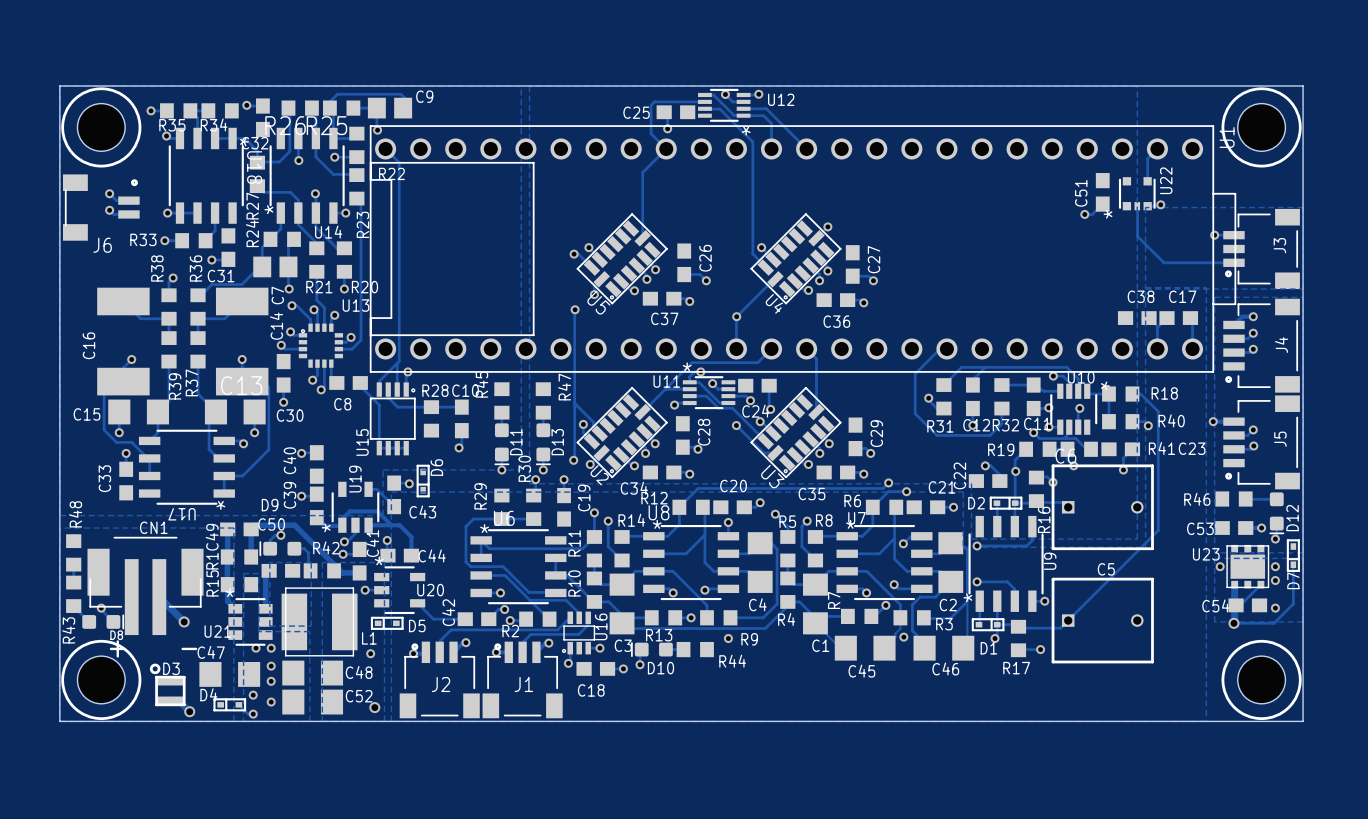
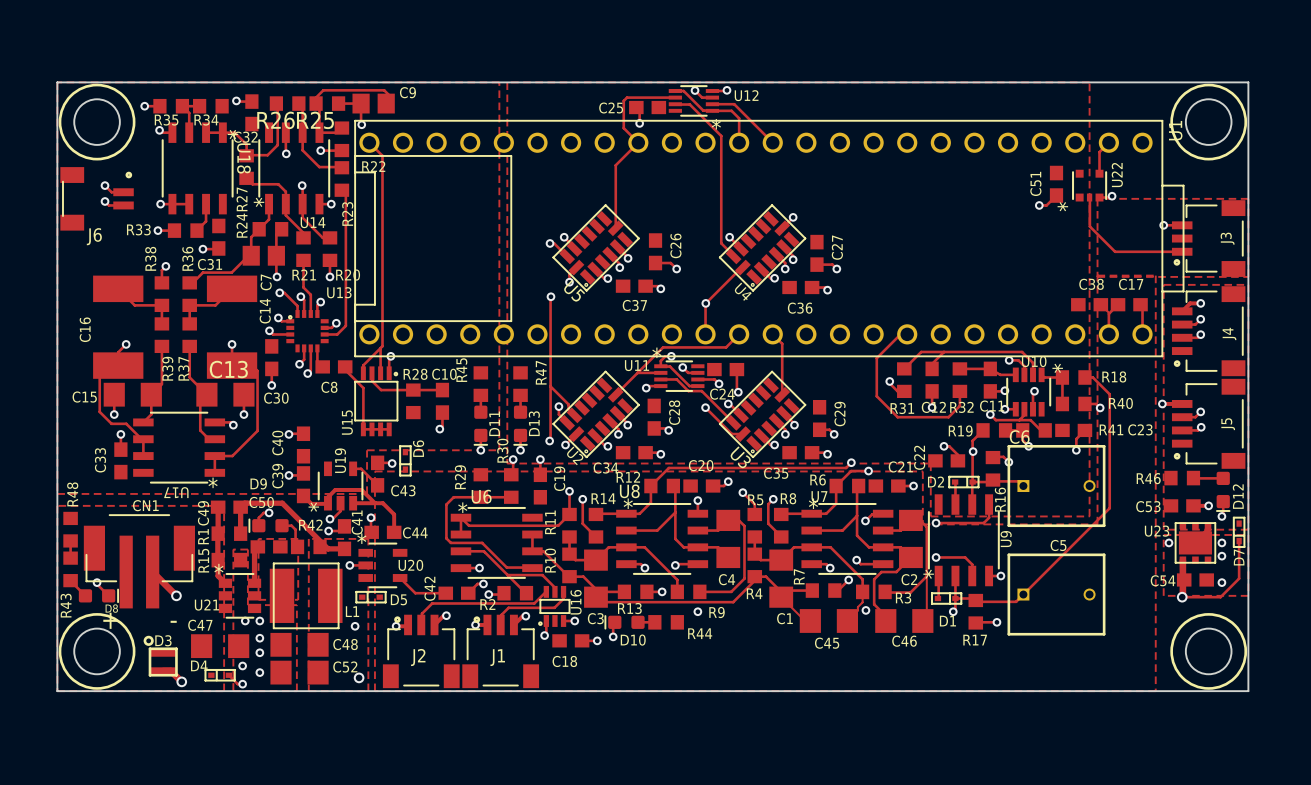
track: (1260, 584) (1238, 606) (1234, 606) -> none

